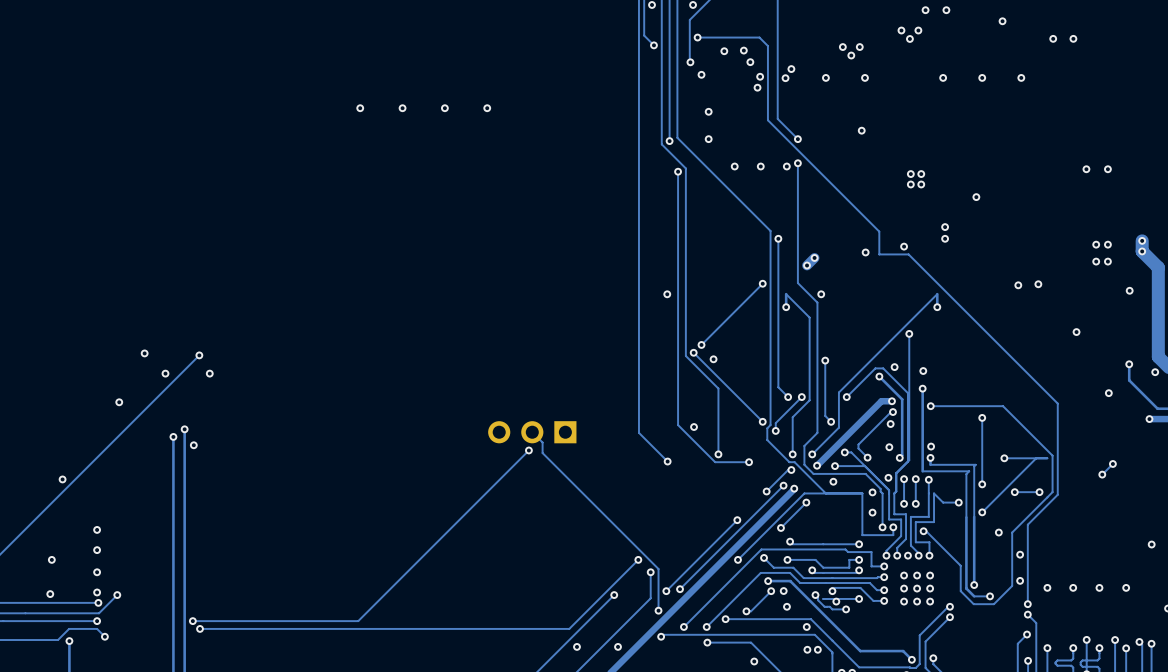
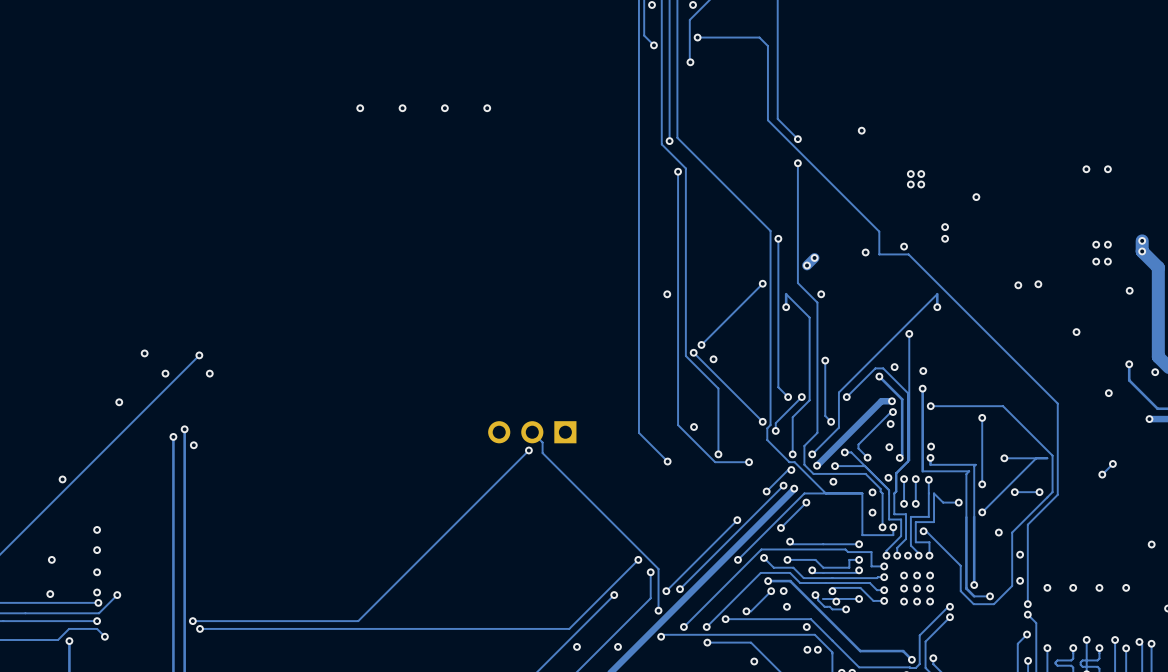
via: (925, 10) -> none
via: (946, 10) -> none
via: (1002, 21) -> none
via: (901, 30) -> none
via: (918, 30) -> none
via: (909, 38) -> none
via: (1053, 38) -> none
via: (1073, 38) -> none
via: (842, 47) -> none
via: (859, 47) -> none
via: (743, 50) -> none
via: (724, 51) -> none
via: (851, 55) -> none
via: (750, 62) -> none
via: (791, 69) -> none
via: (701, 74) -> none
via: (760, 76) -> none
via: (825, 77) -> none
via: (864, 77) -> none
via: (943, 77) -> none
via: (982, 77) -> none
via: (1021, 77) -> none
via: (785, 78) -> none
via: (757, 87) -> none
via: (708, 111) -> none
via: (708, 139) -> none
via: (734, 166) -> none
via: (760, 166) -> none
via: (786, 166) -> none

